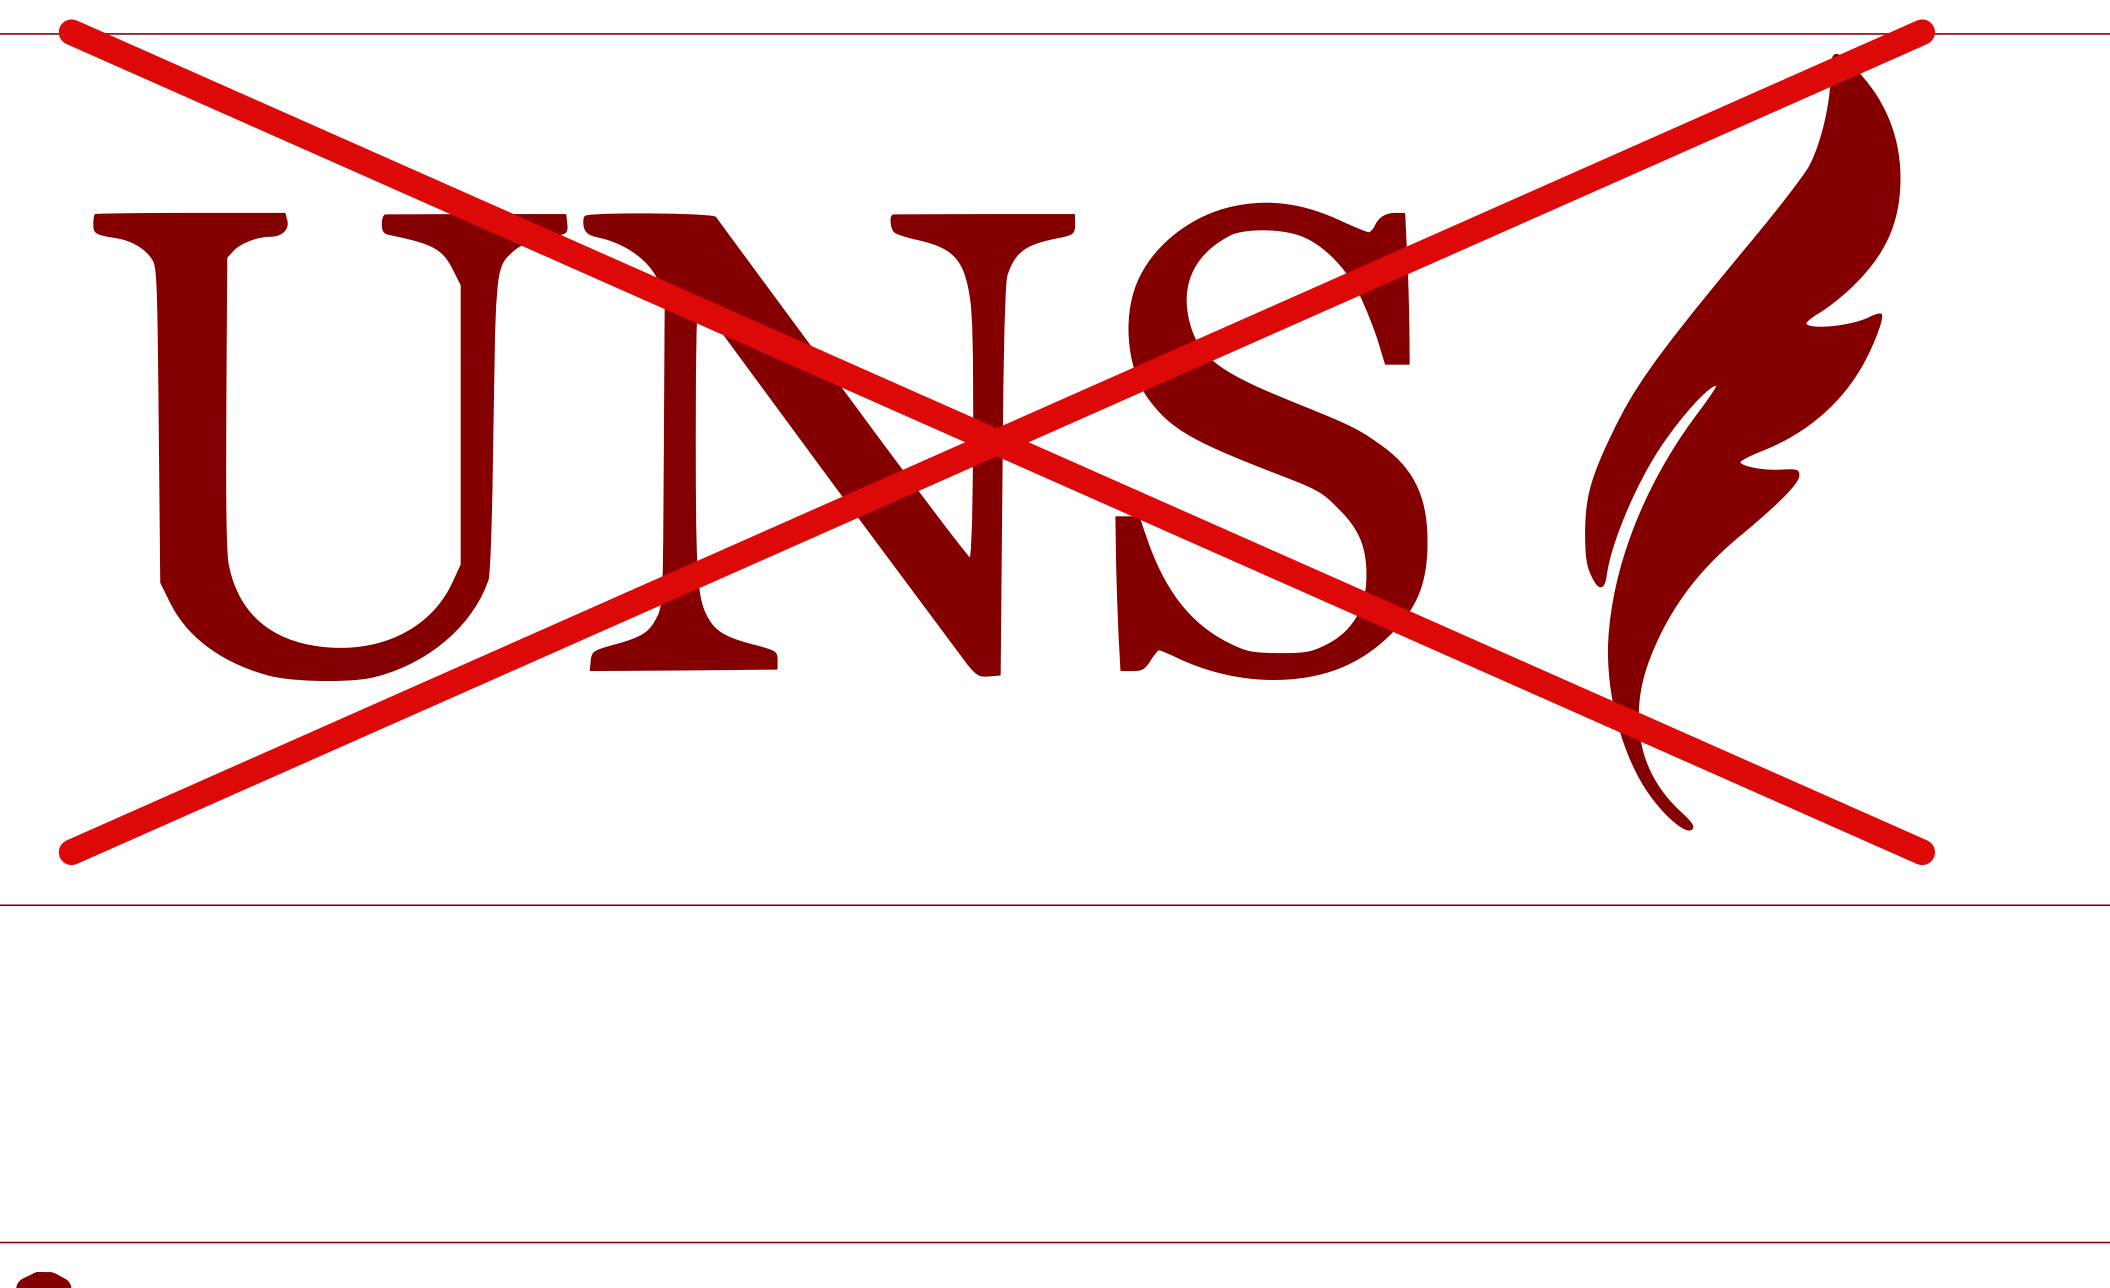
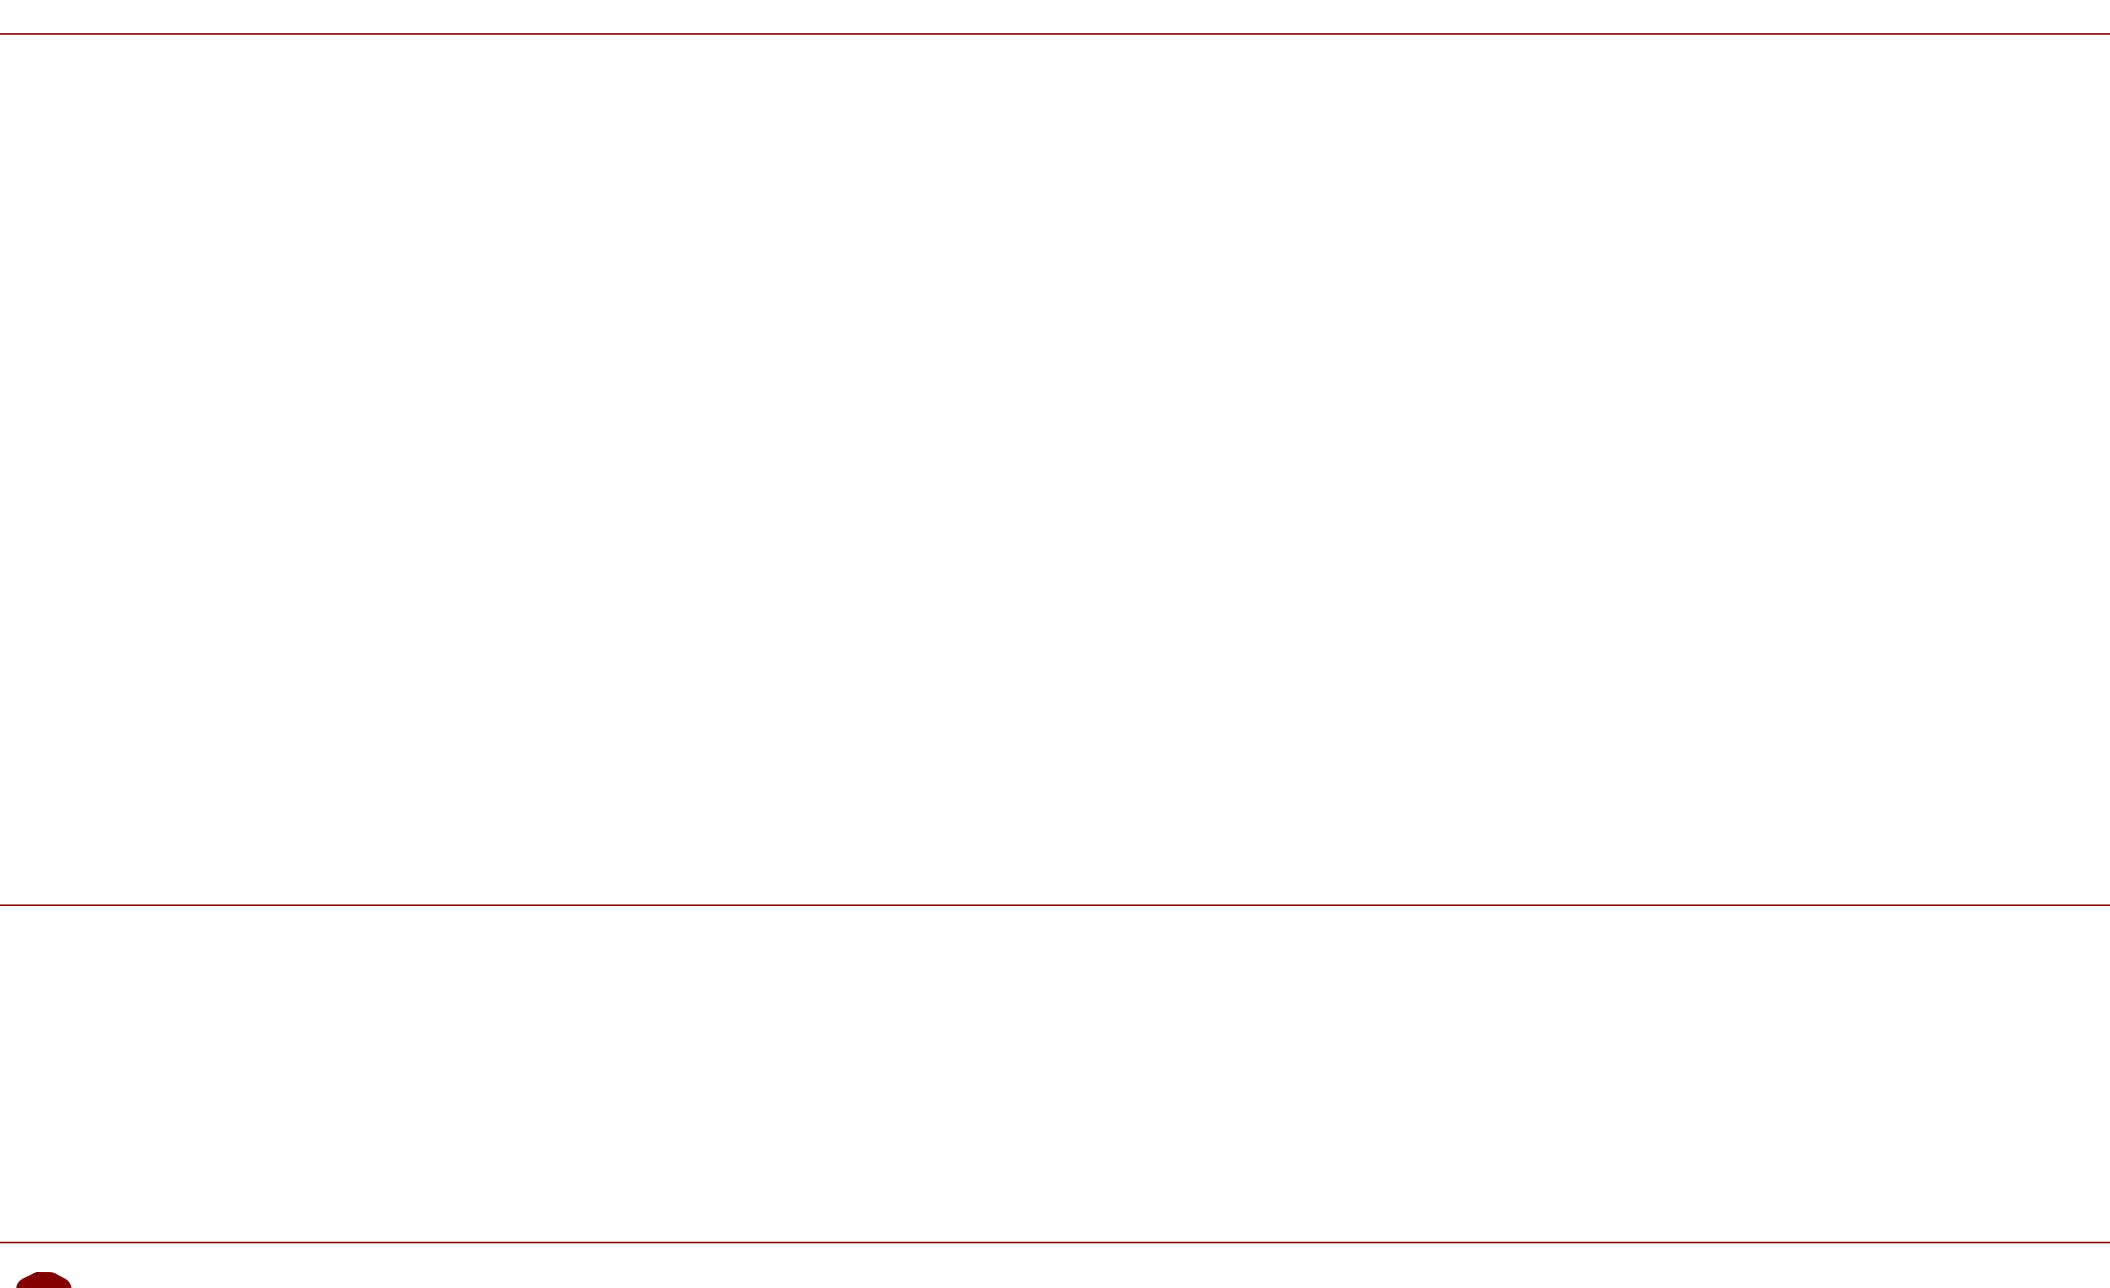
part: (996, 442) -> none

